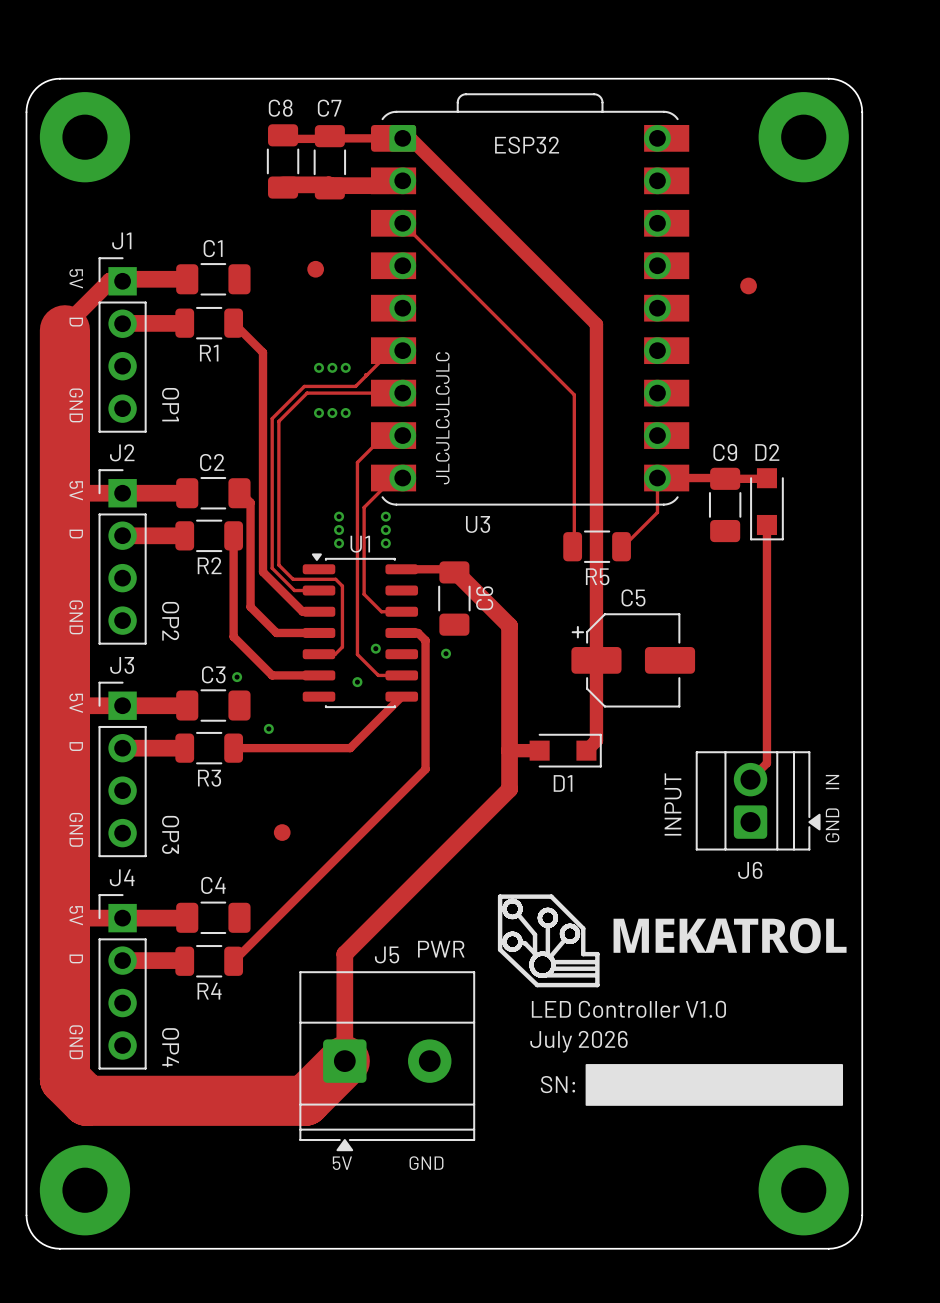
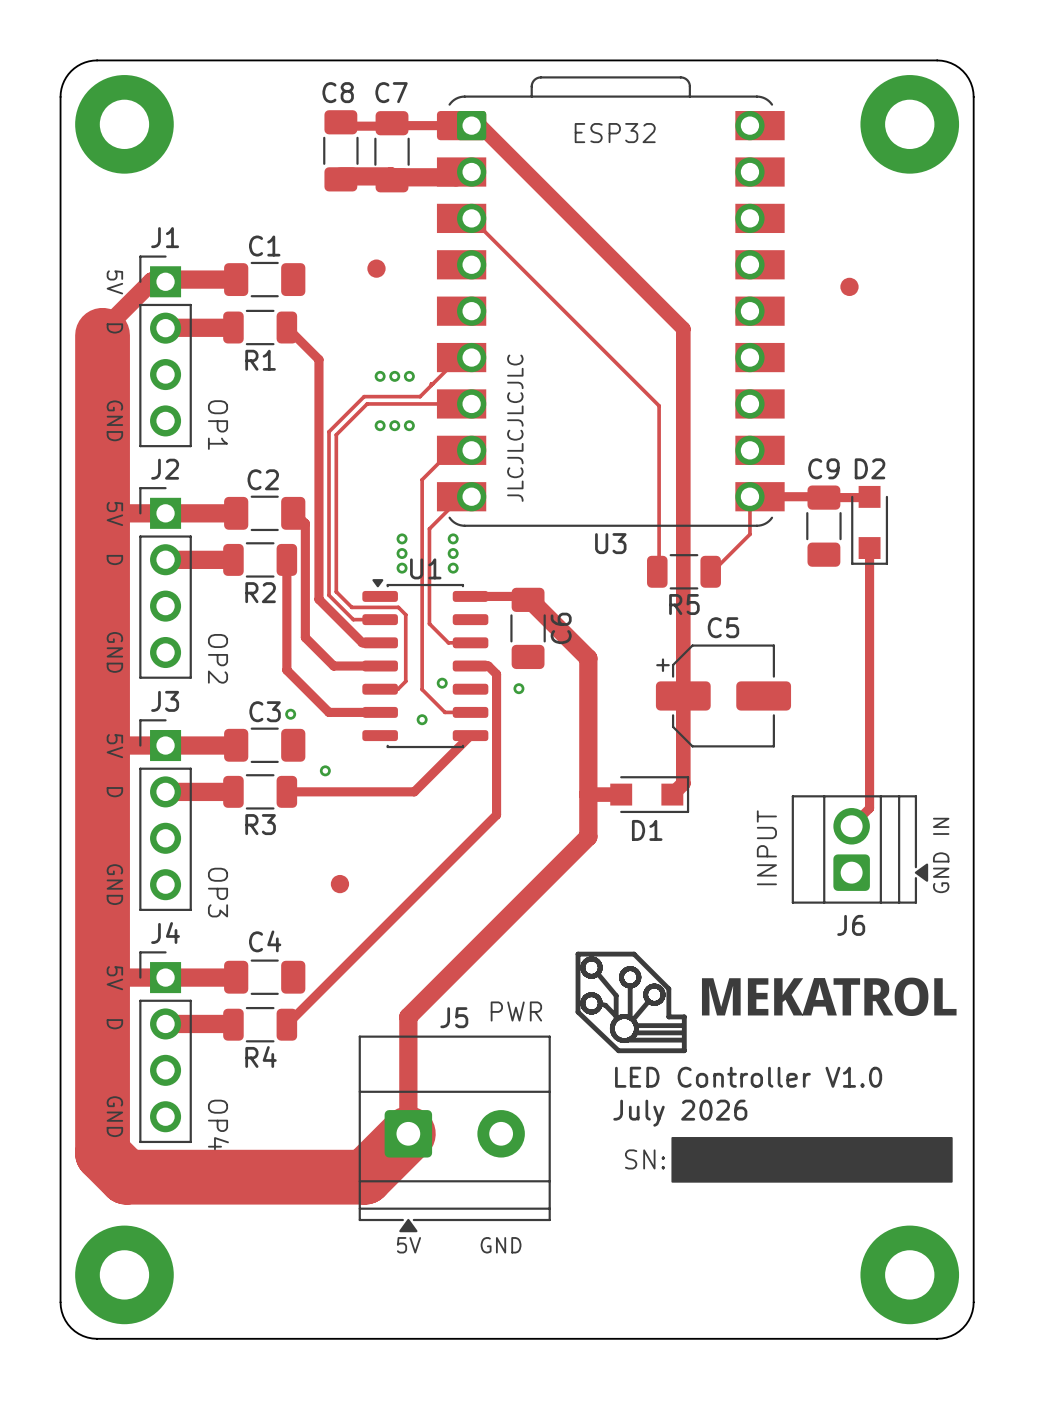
U3 name position: U3 (478, 524) -> U3 (610, 543)

